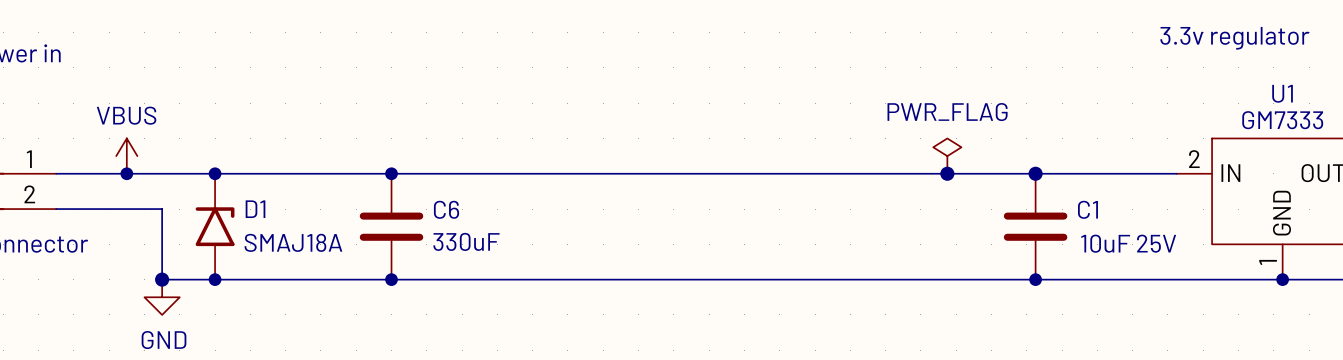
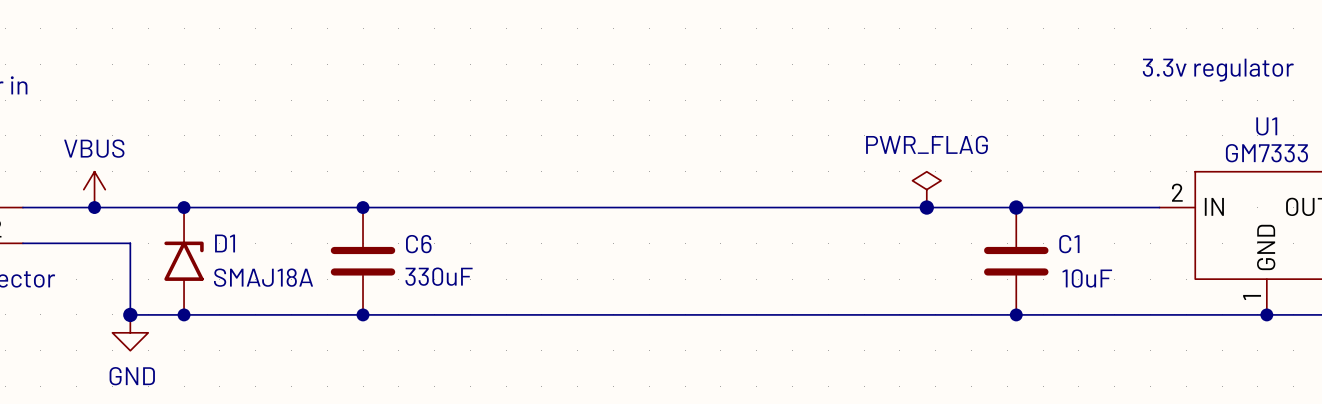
C1 value: 10uF 25V (1128, 243) -> 10uF (1087, 278)

